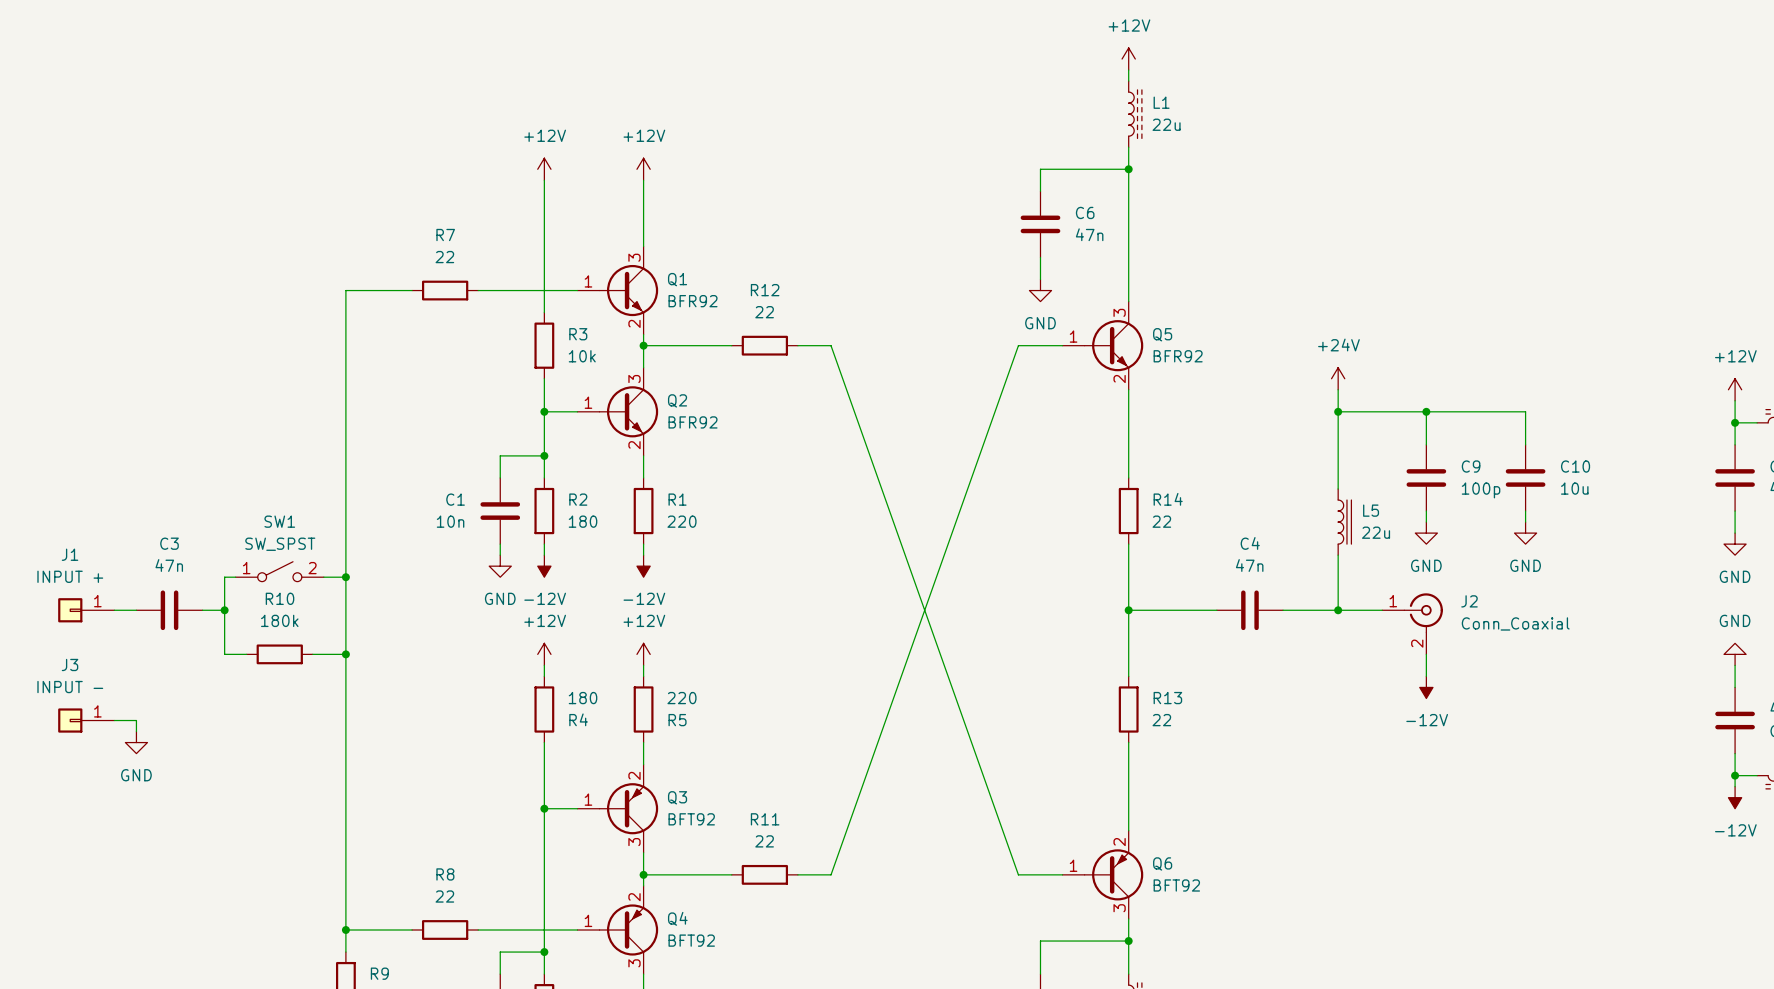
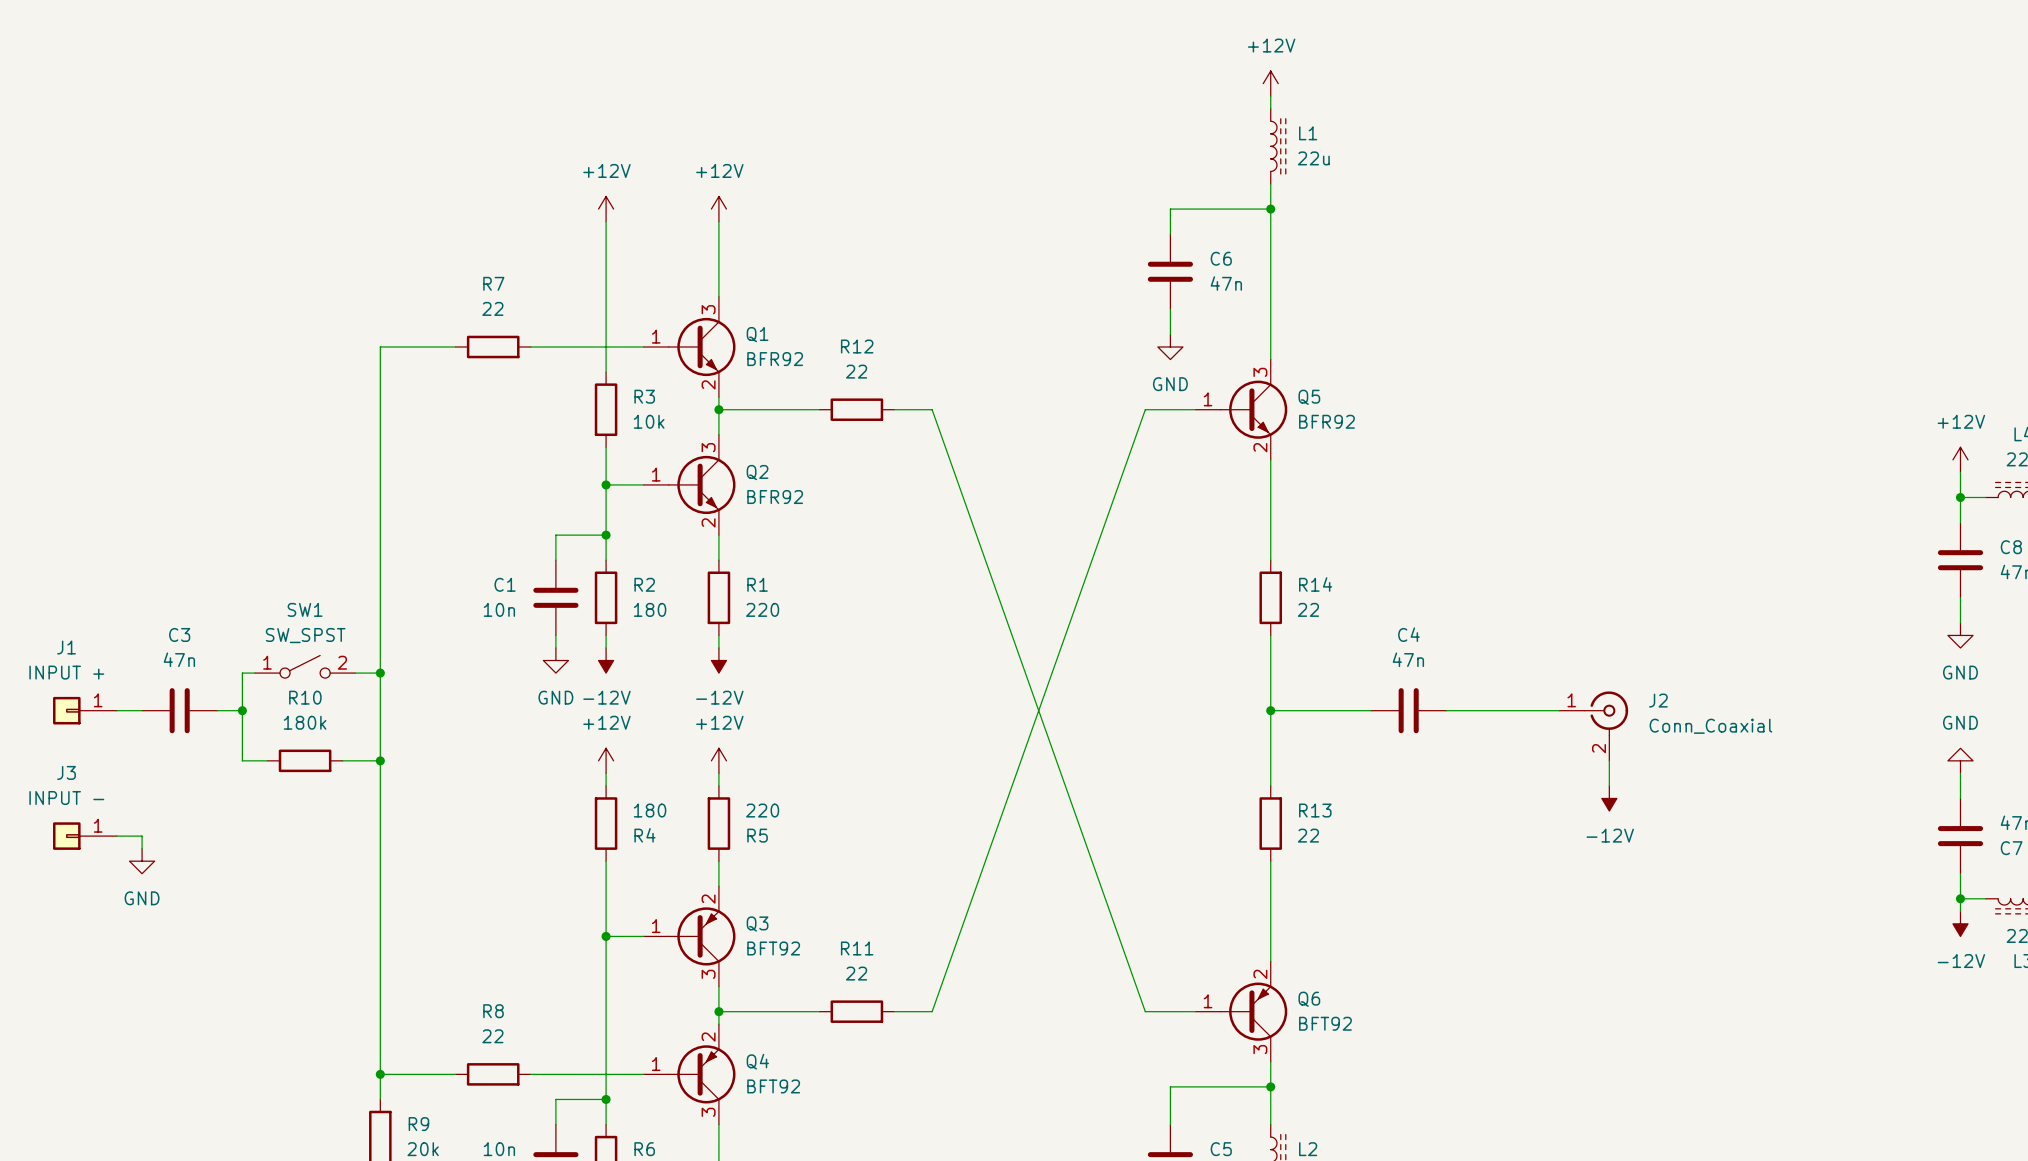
power symbol: +24V (1338, 378) -> none
wire: (1338, 389) (1338, 488) -> none
wire: (1338, 411) (1525, 411) (1525, 444) -> none
junction: (1338, 411) -> none
wire: (1426, 411) (1426, 444) -> none
junction: (1426, 411) -> none
C9: 100p (1426, 477) -> none
C10: 10u (1525, 477) -> none
wire: (1426, 511) (1426, 522) -> none
wire: (1525, 511) (1525, 522) -> none
L5: 22u (1344, 522) -> none
power symbol: GND (1426, 533) -> none
power symbol: GND (1525, 533) -> none
wire: (1338, 555) (1338, 610) -> none
junction: (1338, 610) -> none

